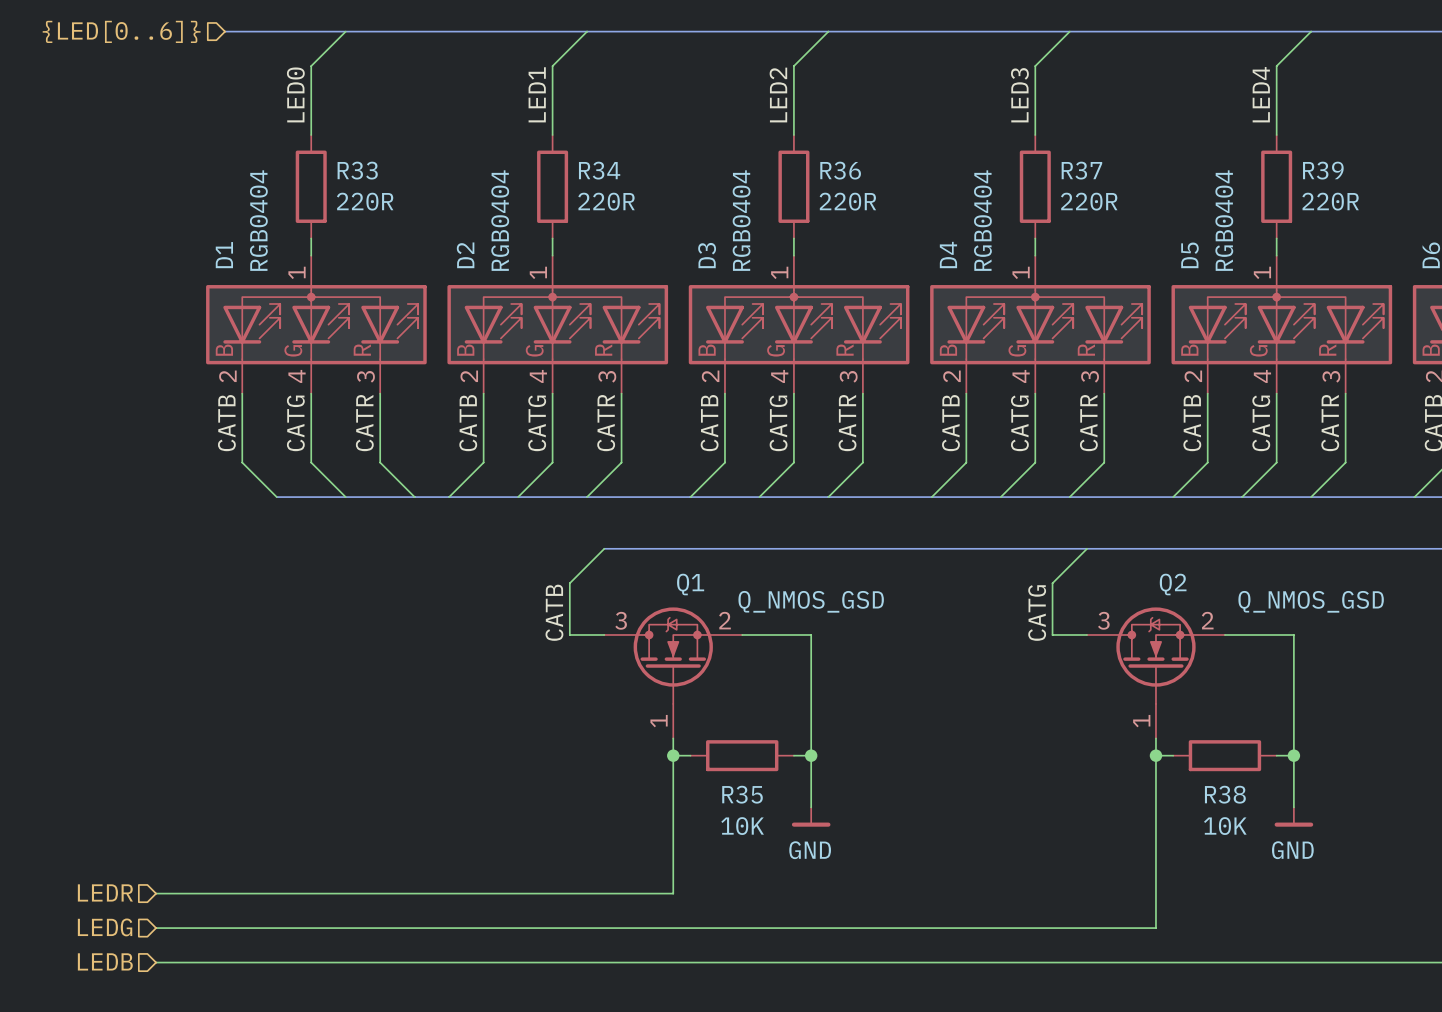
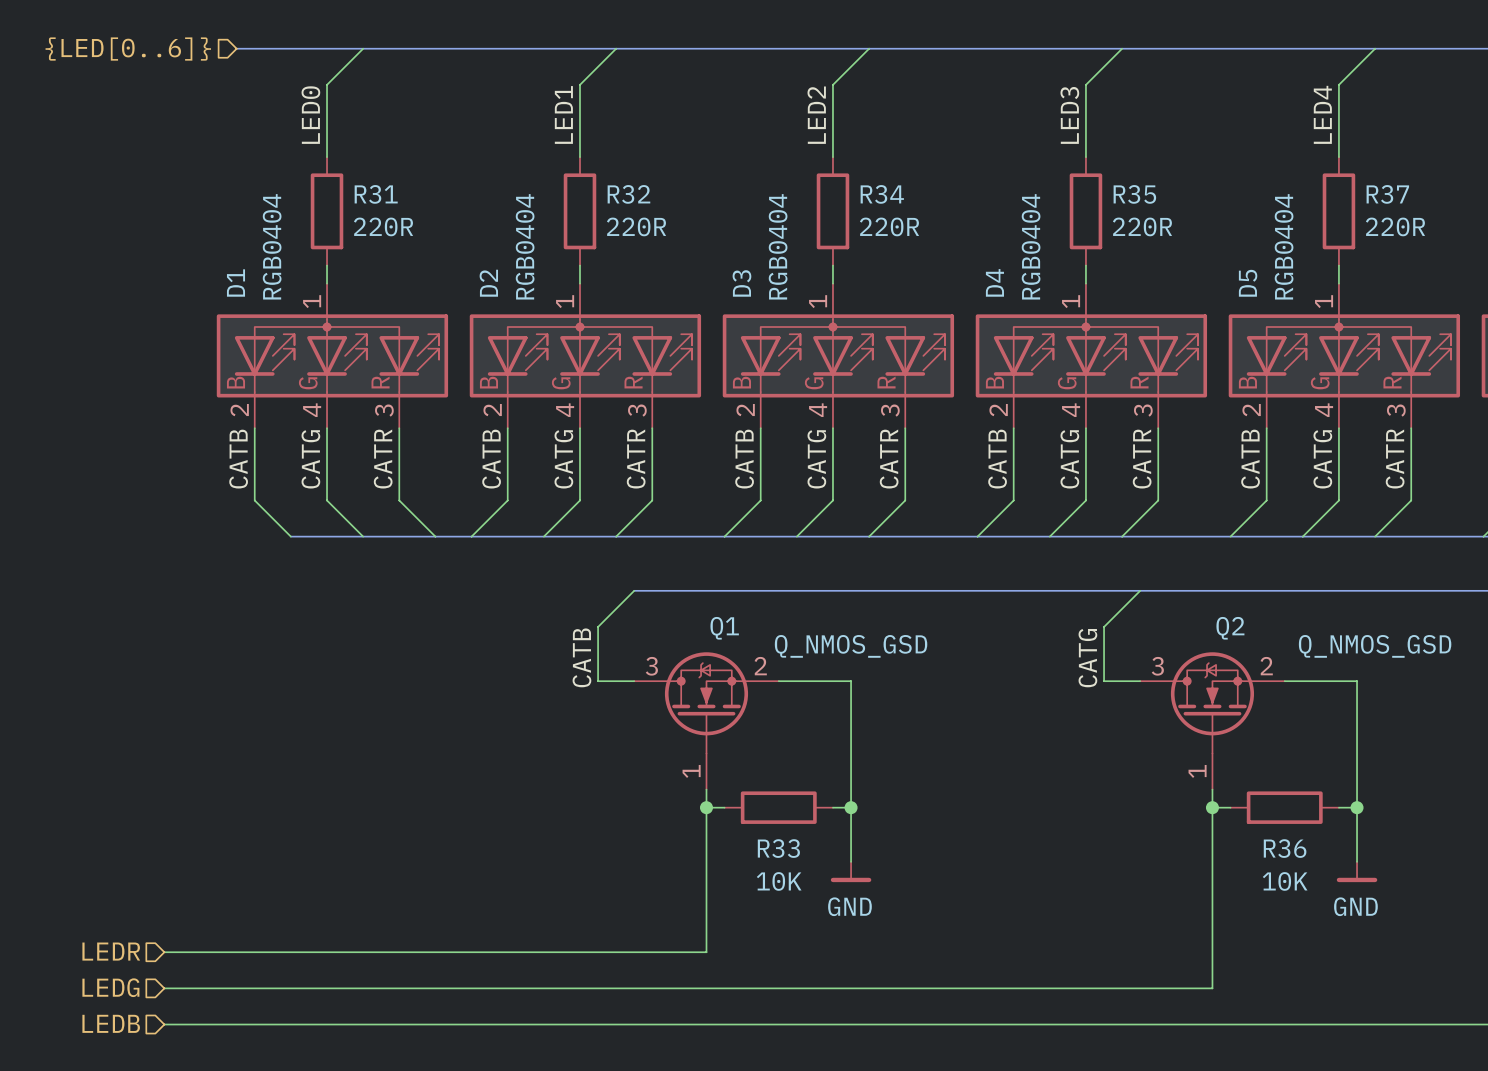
R33 name: R33 (357, 170) -> R31 (376, 194)
R34 name: R34 (599, 170) -> R32 (628, 194)
R36 name: R36 (840, 170) -> R34 (882, 194)
R37 name: R37 (1081, 170) -> R35 (1134, 194)
R39 name: R39 (1323, 170) -> R37 (1387, 194)
R35 name: R35 (742, 794) -> R33 (778, 848)
R38 name: R38 (1225, 794) -> R36 (1285, 848)

